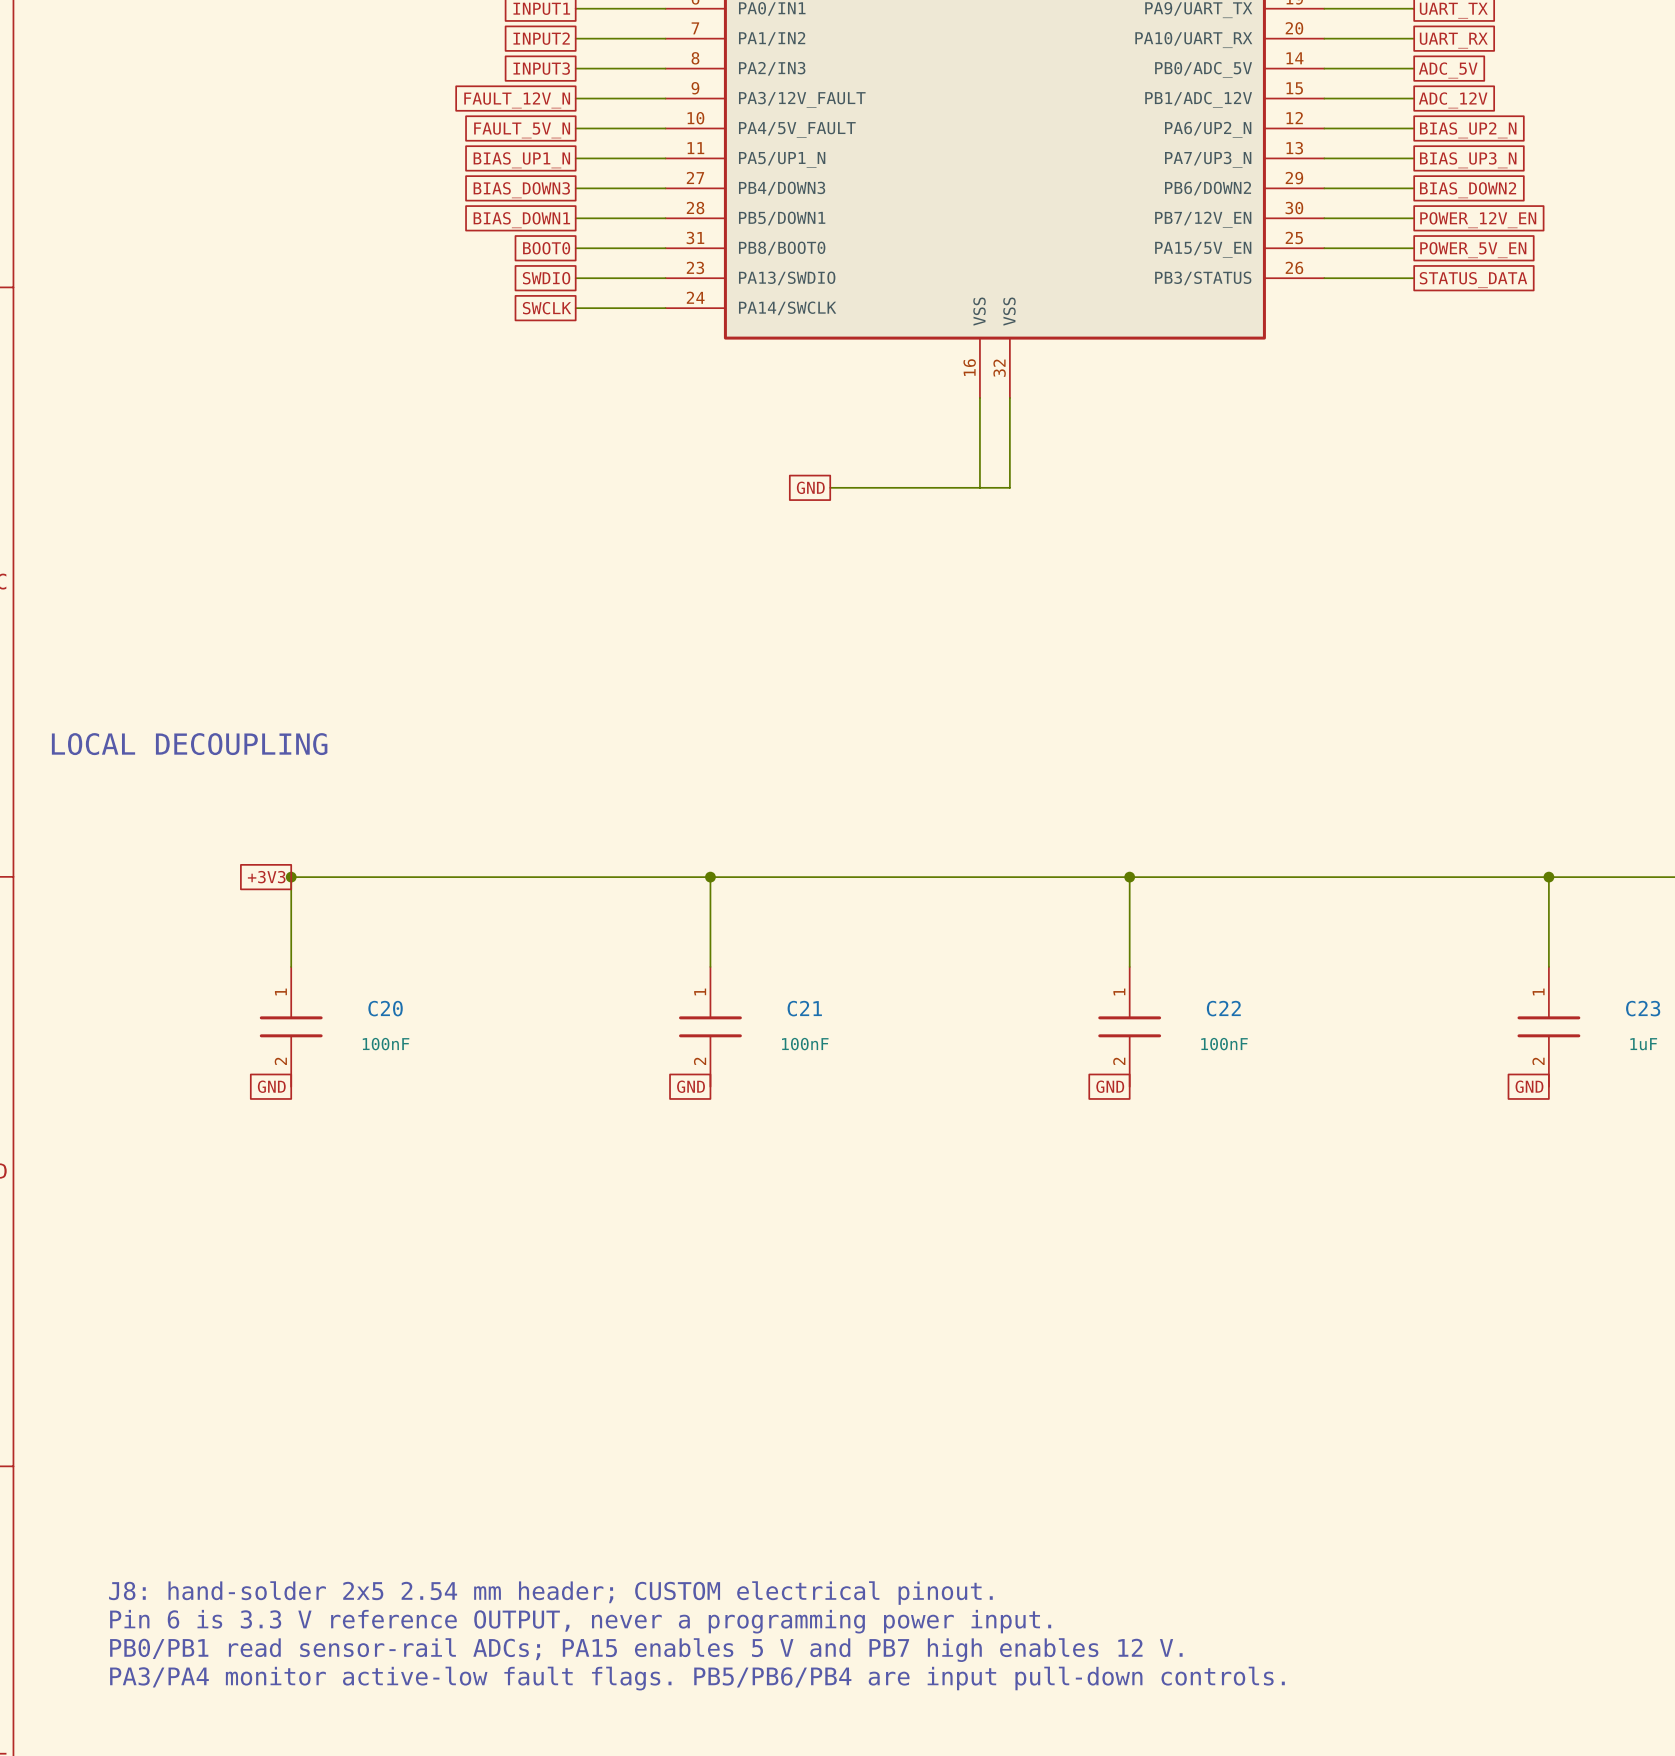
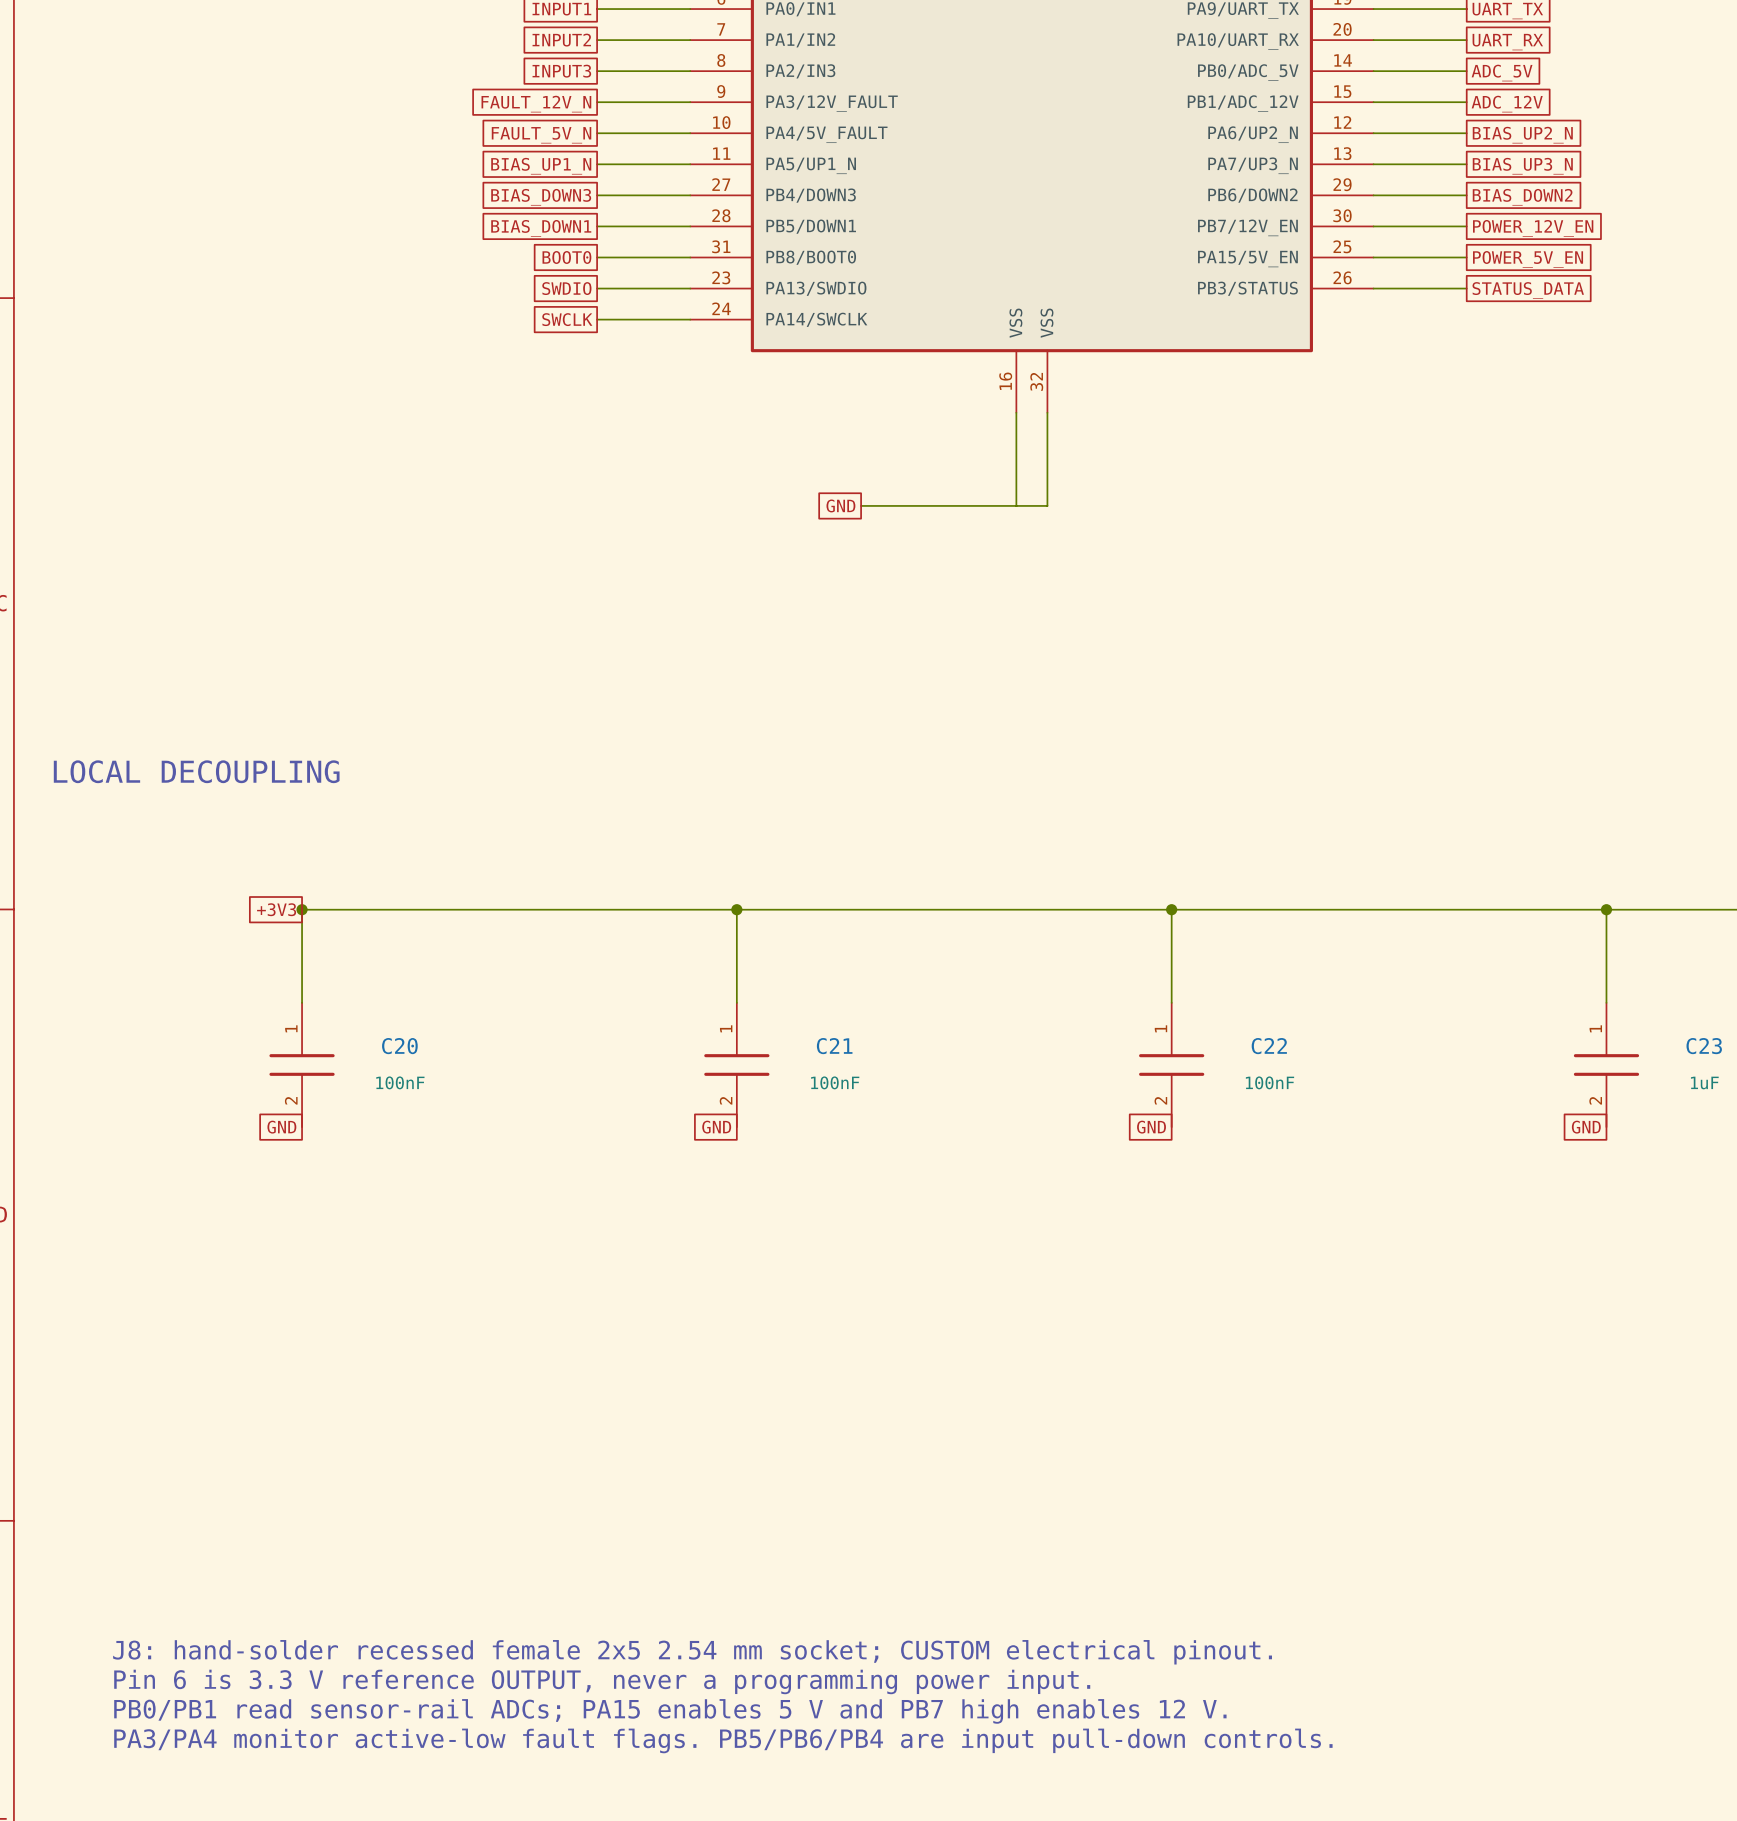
text: J8: hand-solder 2x5 2.54 mm header; CUSTOM electrical pinout. (550, 1593) -> J8: hand-solder recessed female 2x5 2.54 mm socket; CUSTOM electrical pinout. (692, 1652)

